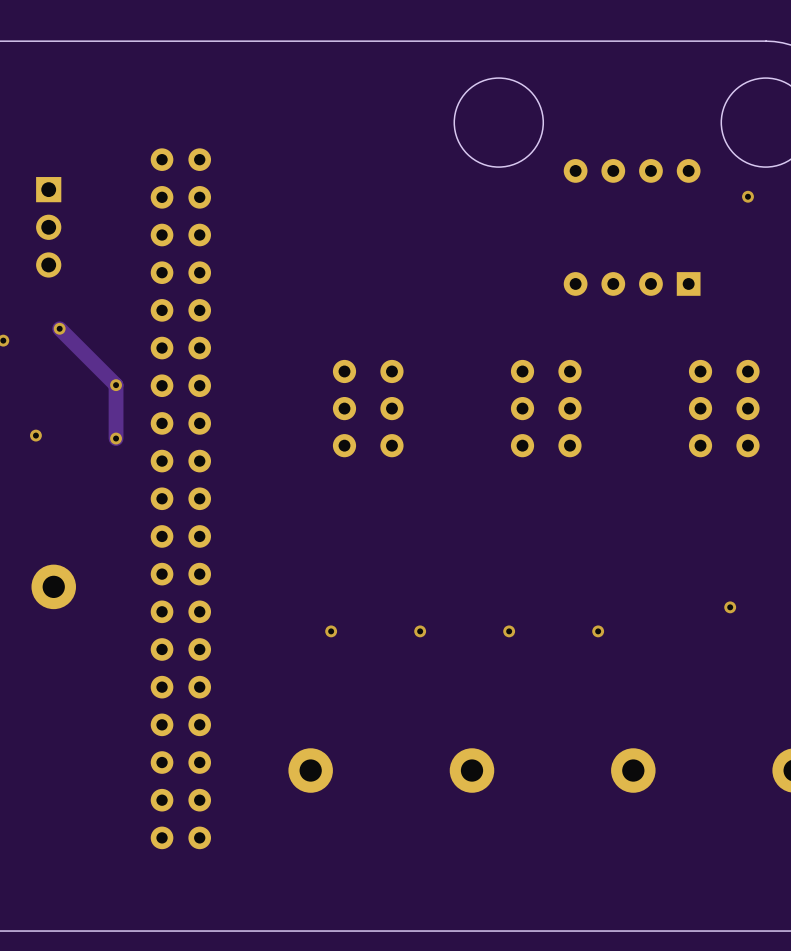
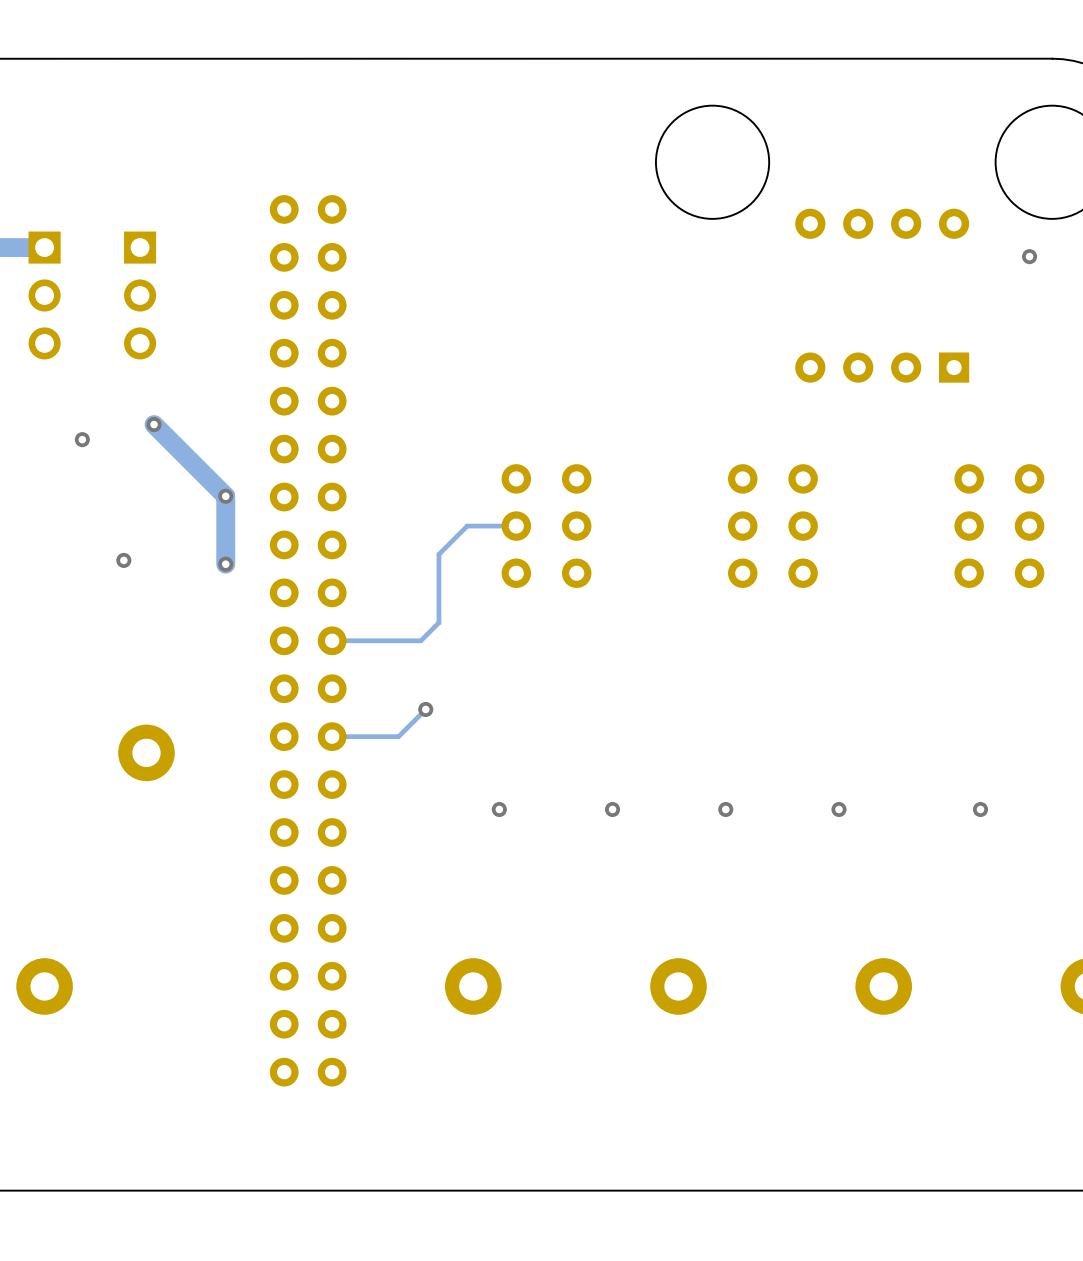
track: none -> (516, 526) (467, 526) (438, 554) (438, 622) (420, 640) (332, 640)
track: none -> (425, 709) (398, 736) (332, 736)
via: none -> (425, 709)
via position: (730, 607) -> (980, 809)

